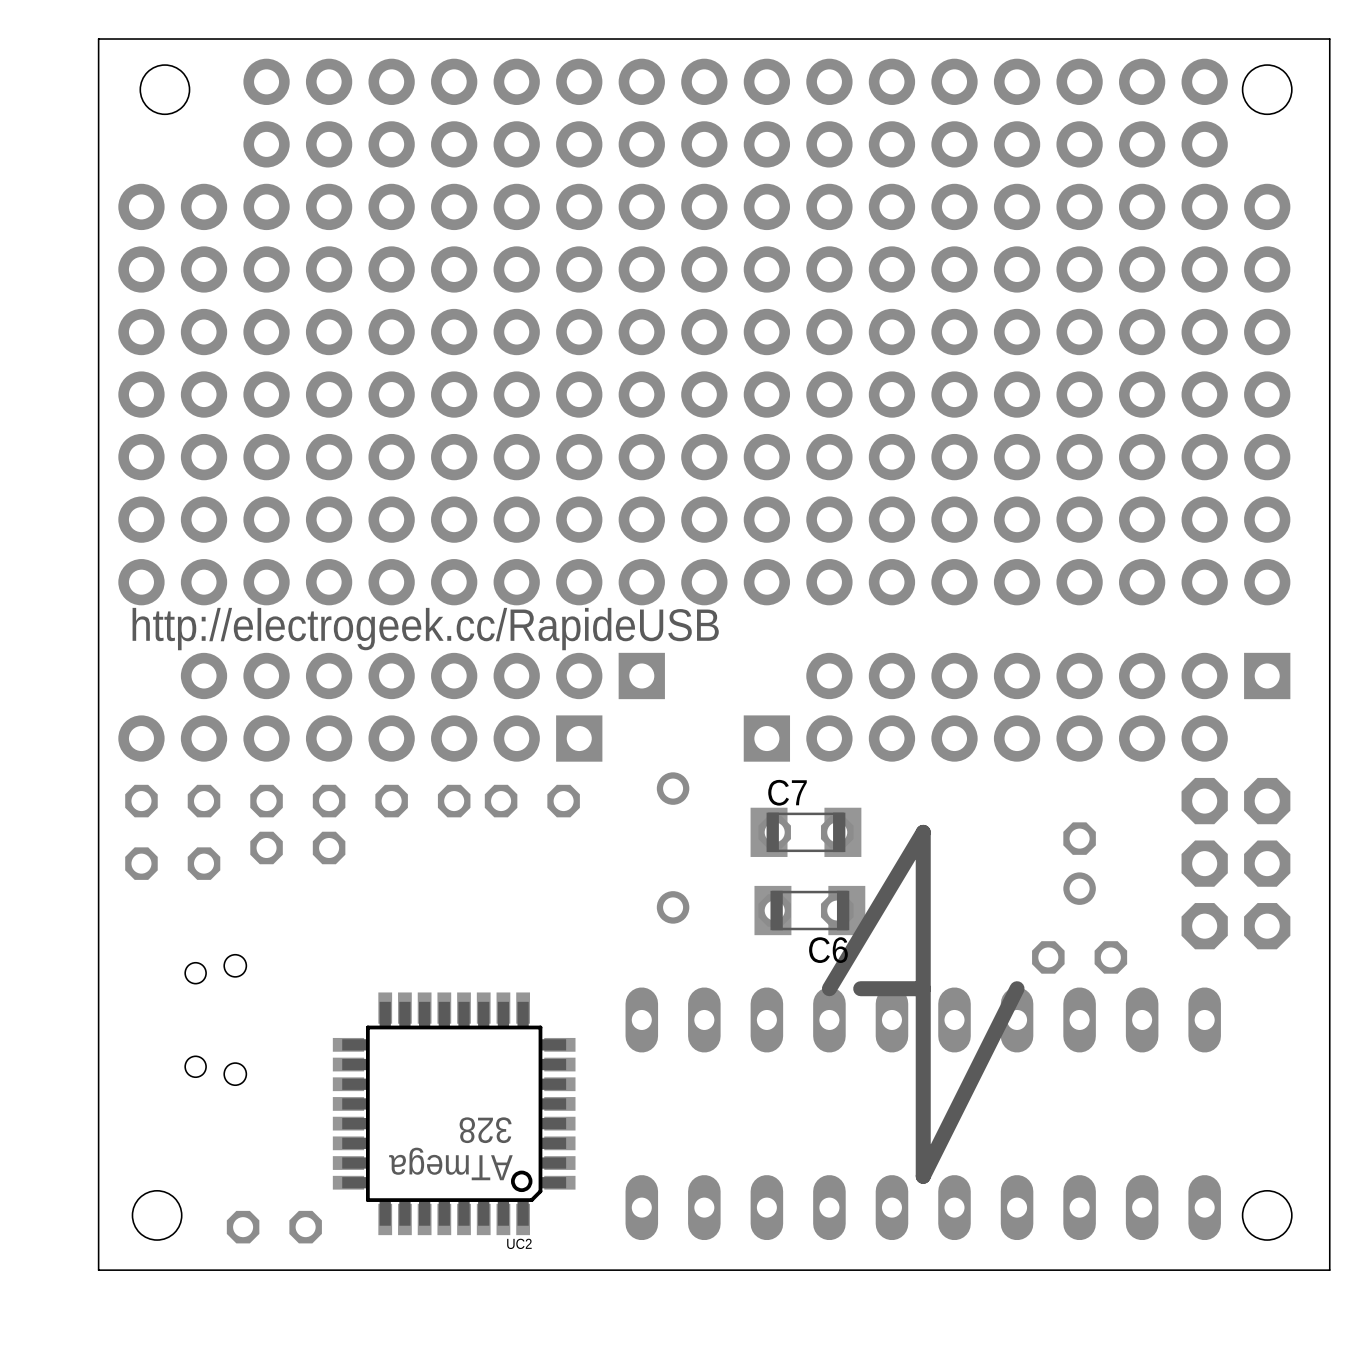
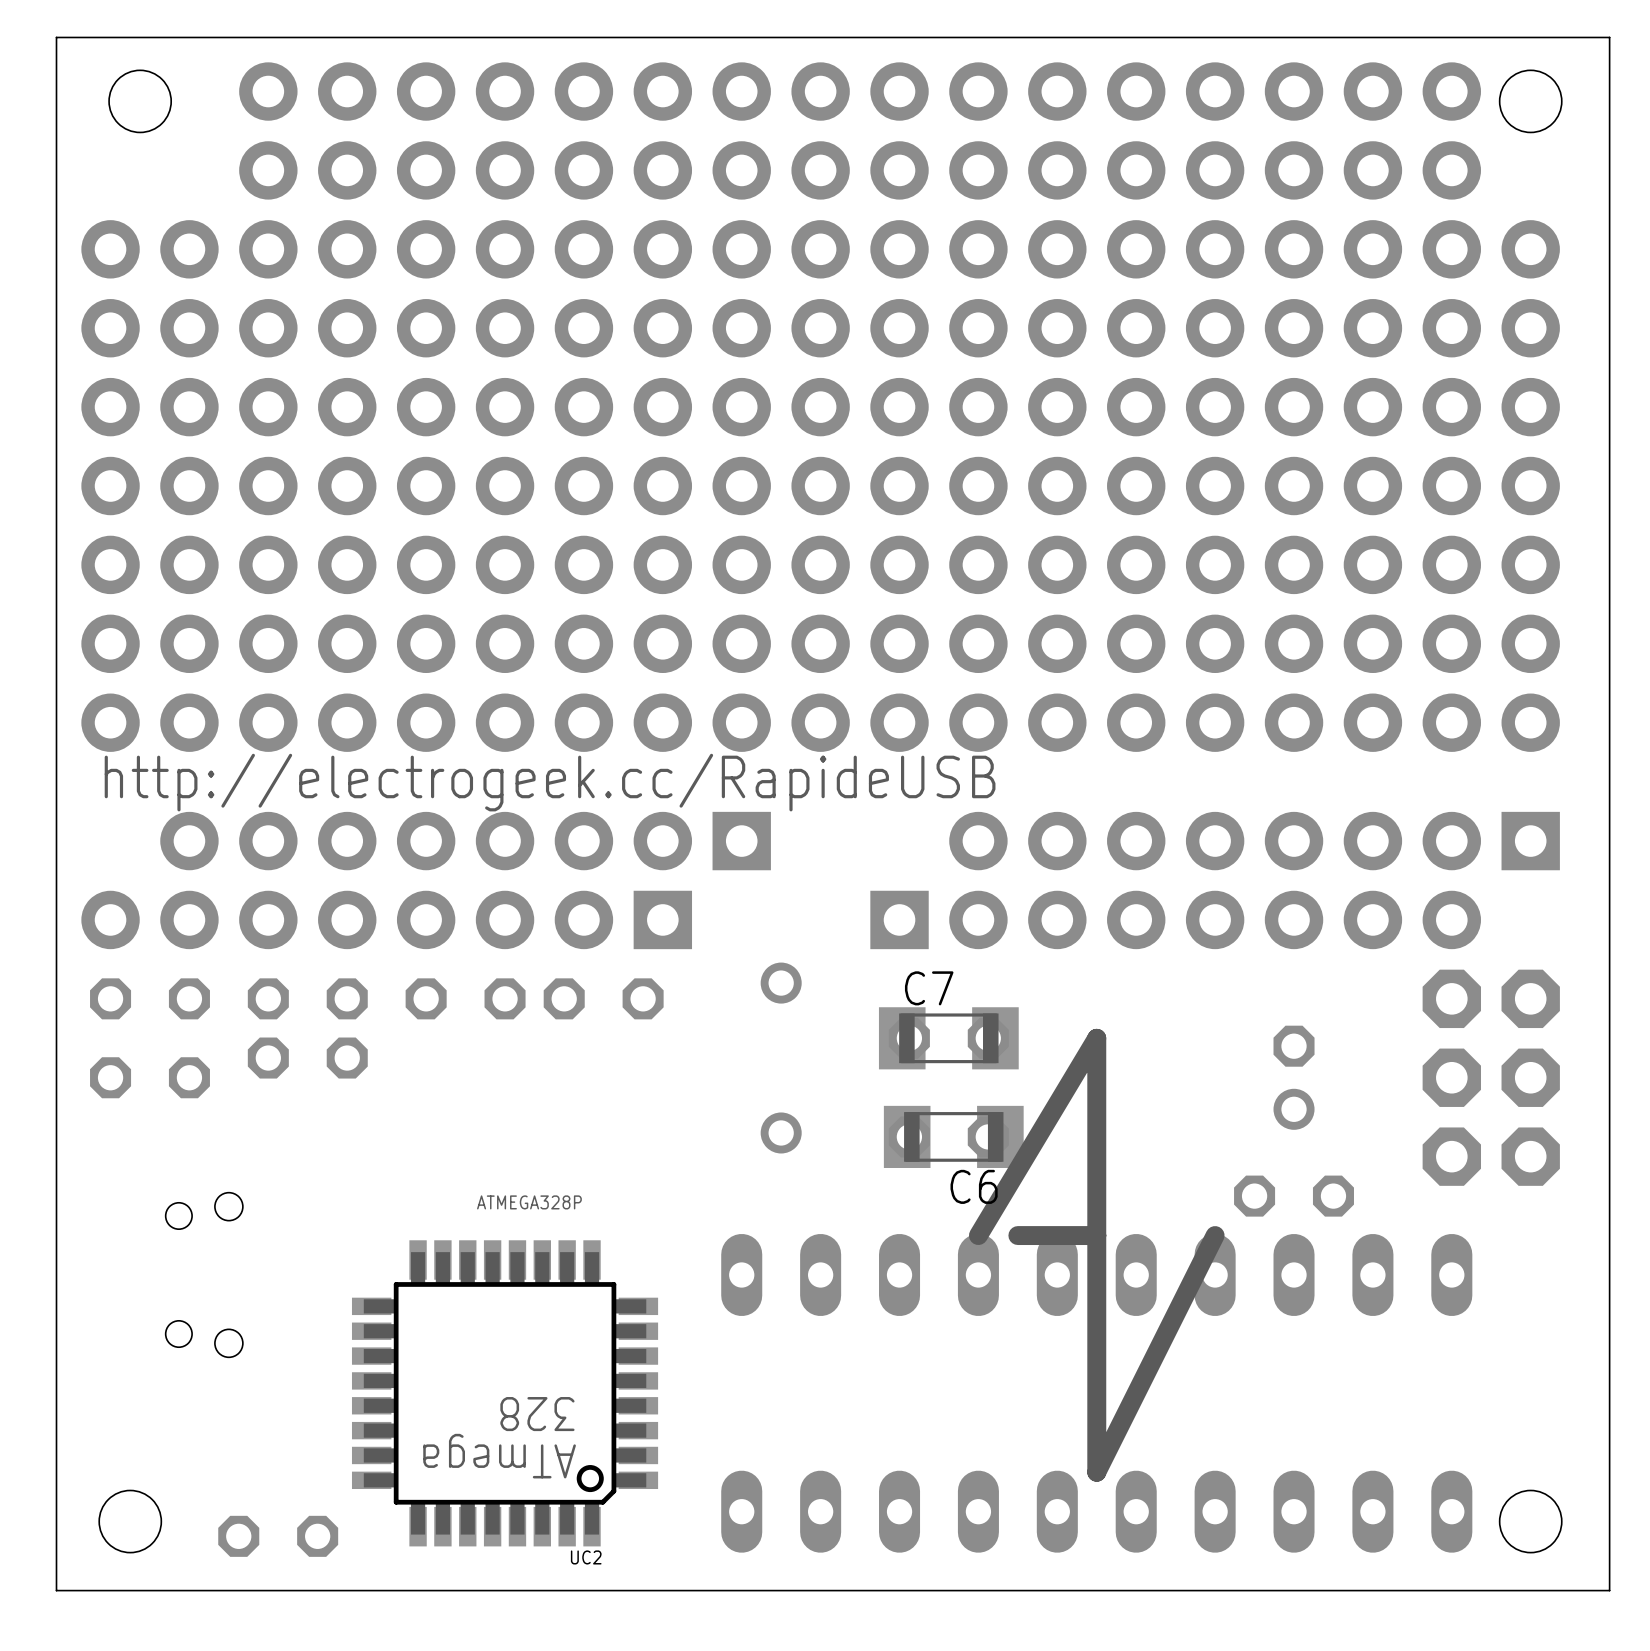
UC2 value: none -> ATMEGA328P (529, 1202)

